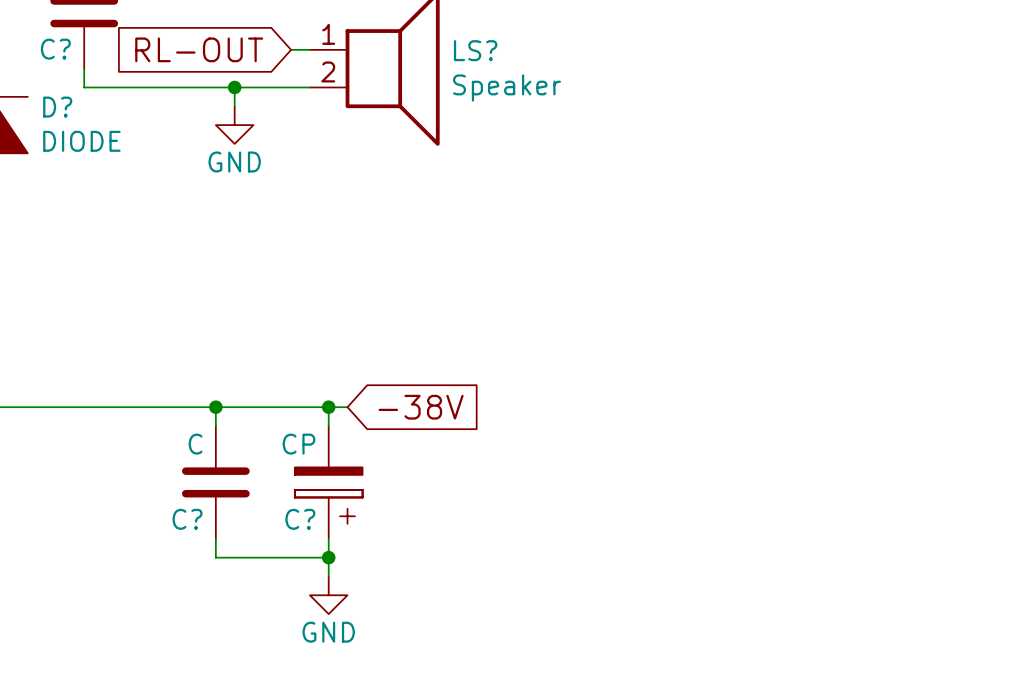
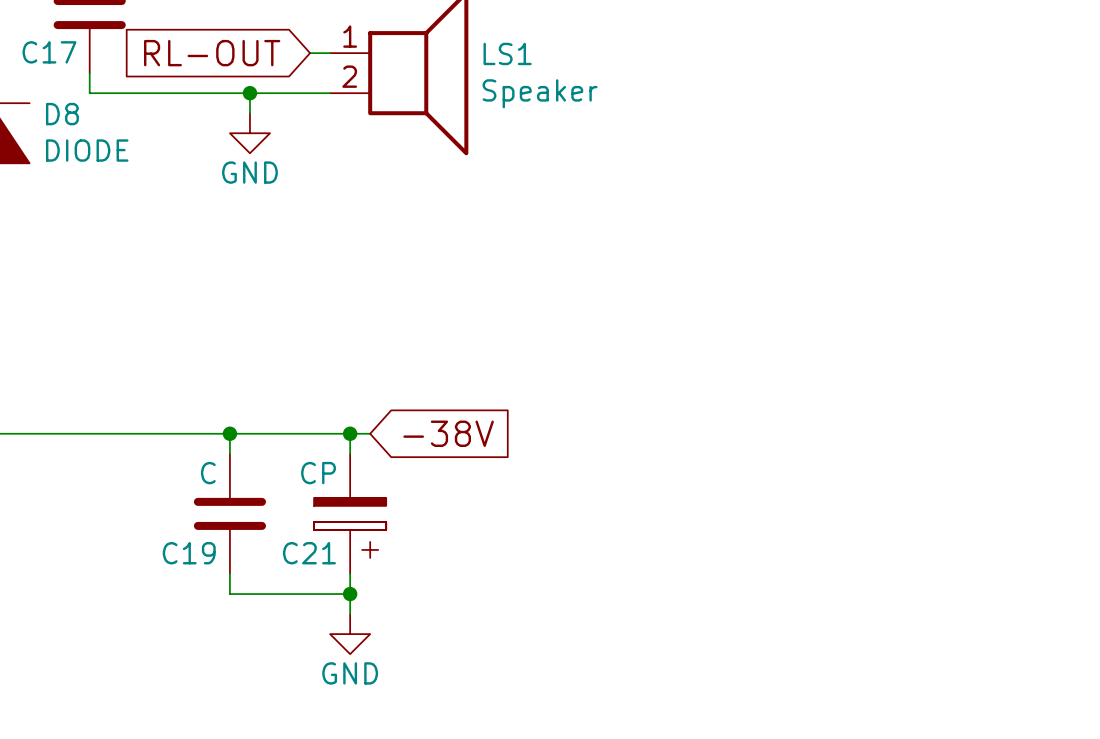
C? name: C? (55, 49) -> C17 (49, 52)
LS? name: LS? (475, 50) -> LS1 (507, 53)
D? name: D? (57, 107) -> D8 (62, 114)
C? name: C? (187, 519) -> C19 (189, 553)
C? name: C? (300, 519) -> C21 (309, 553)

